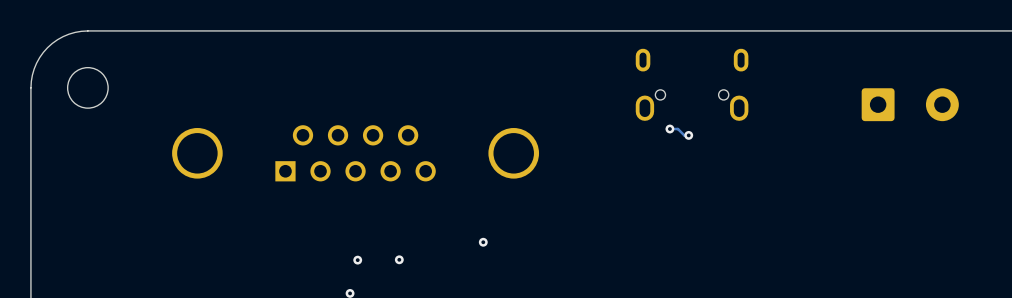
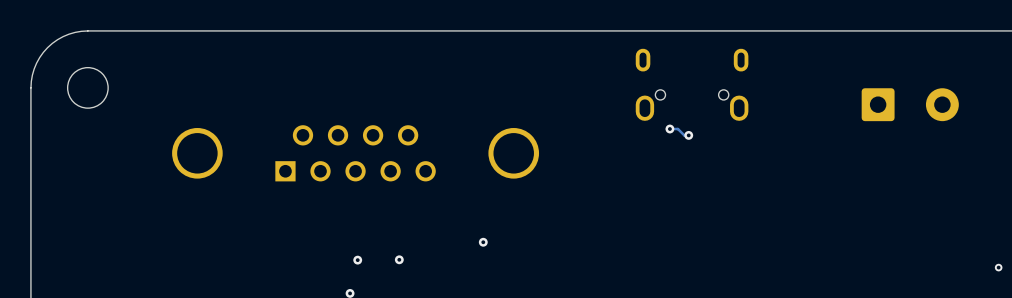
via: none -> (998, 267)

